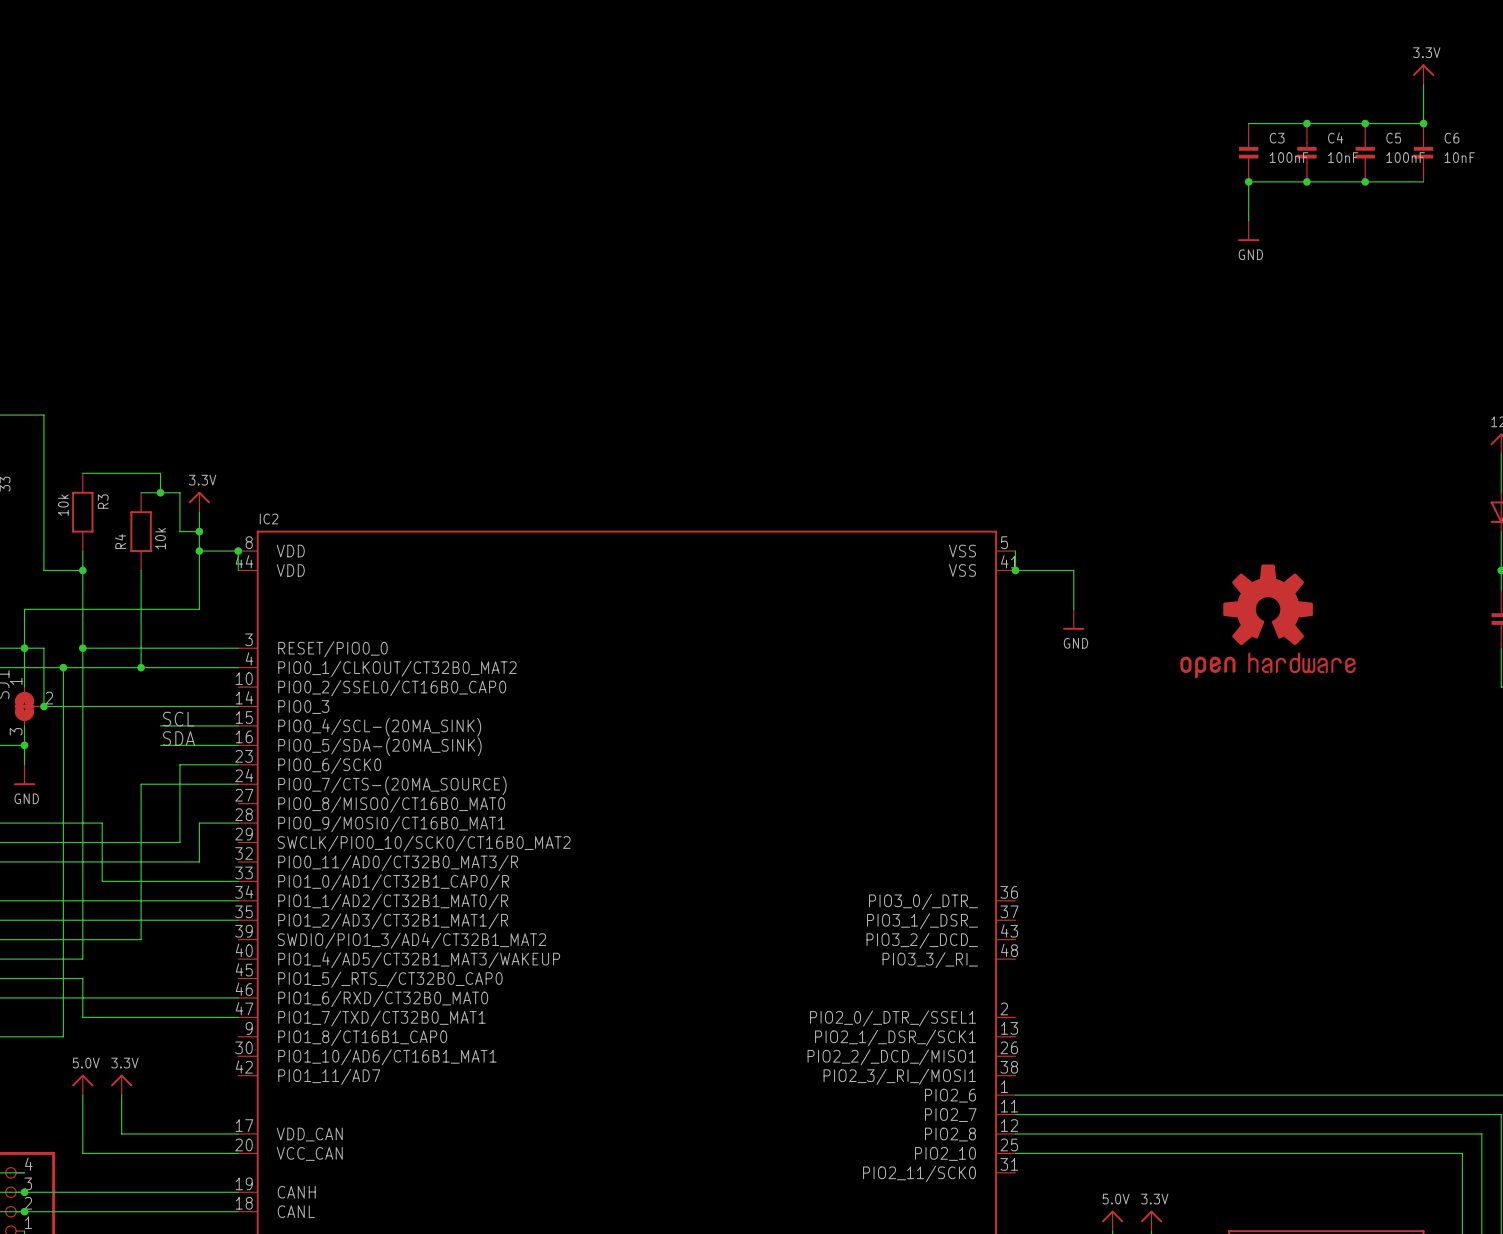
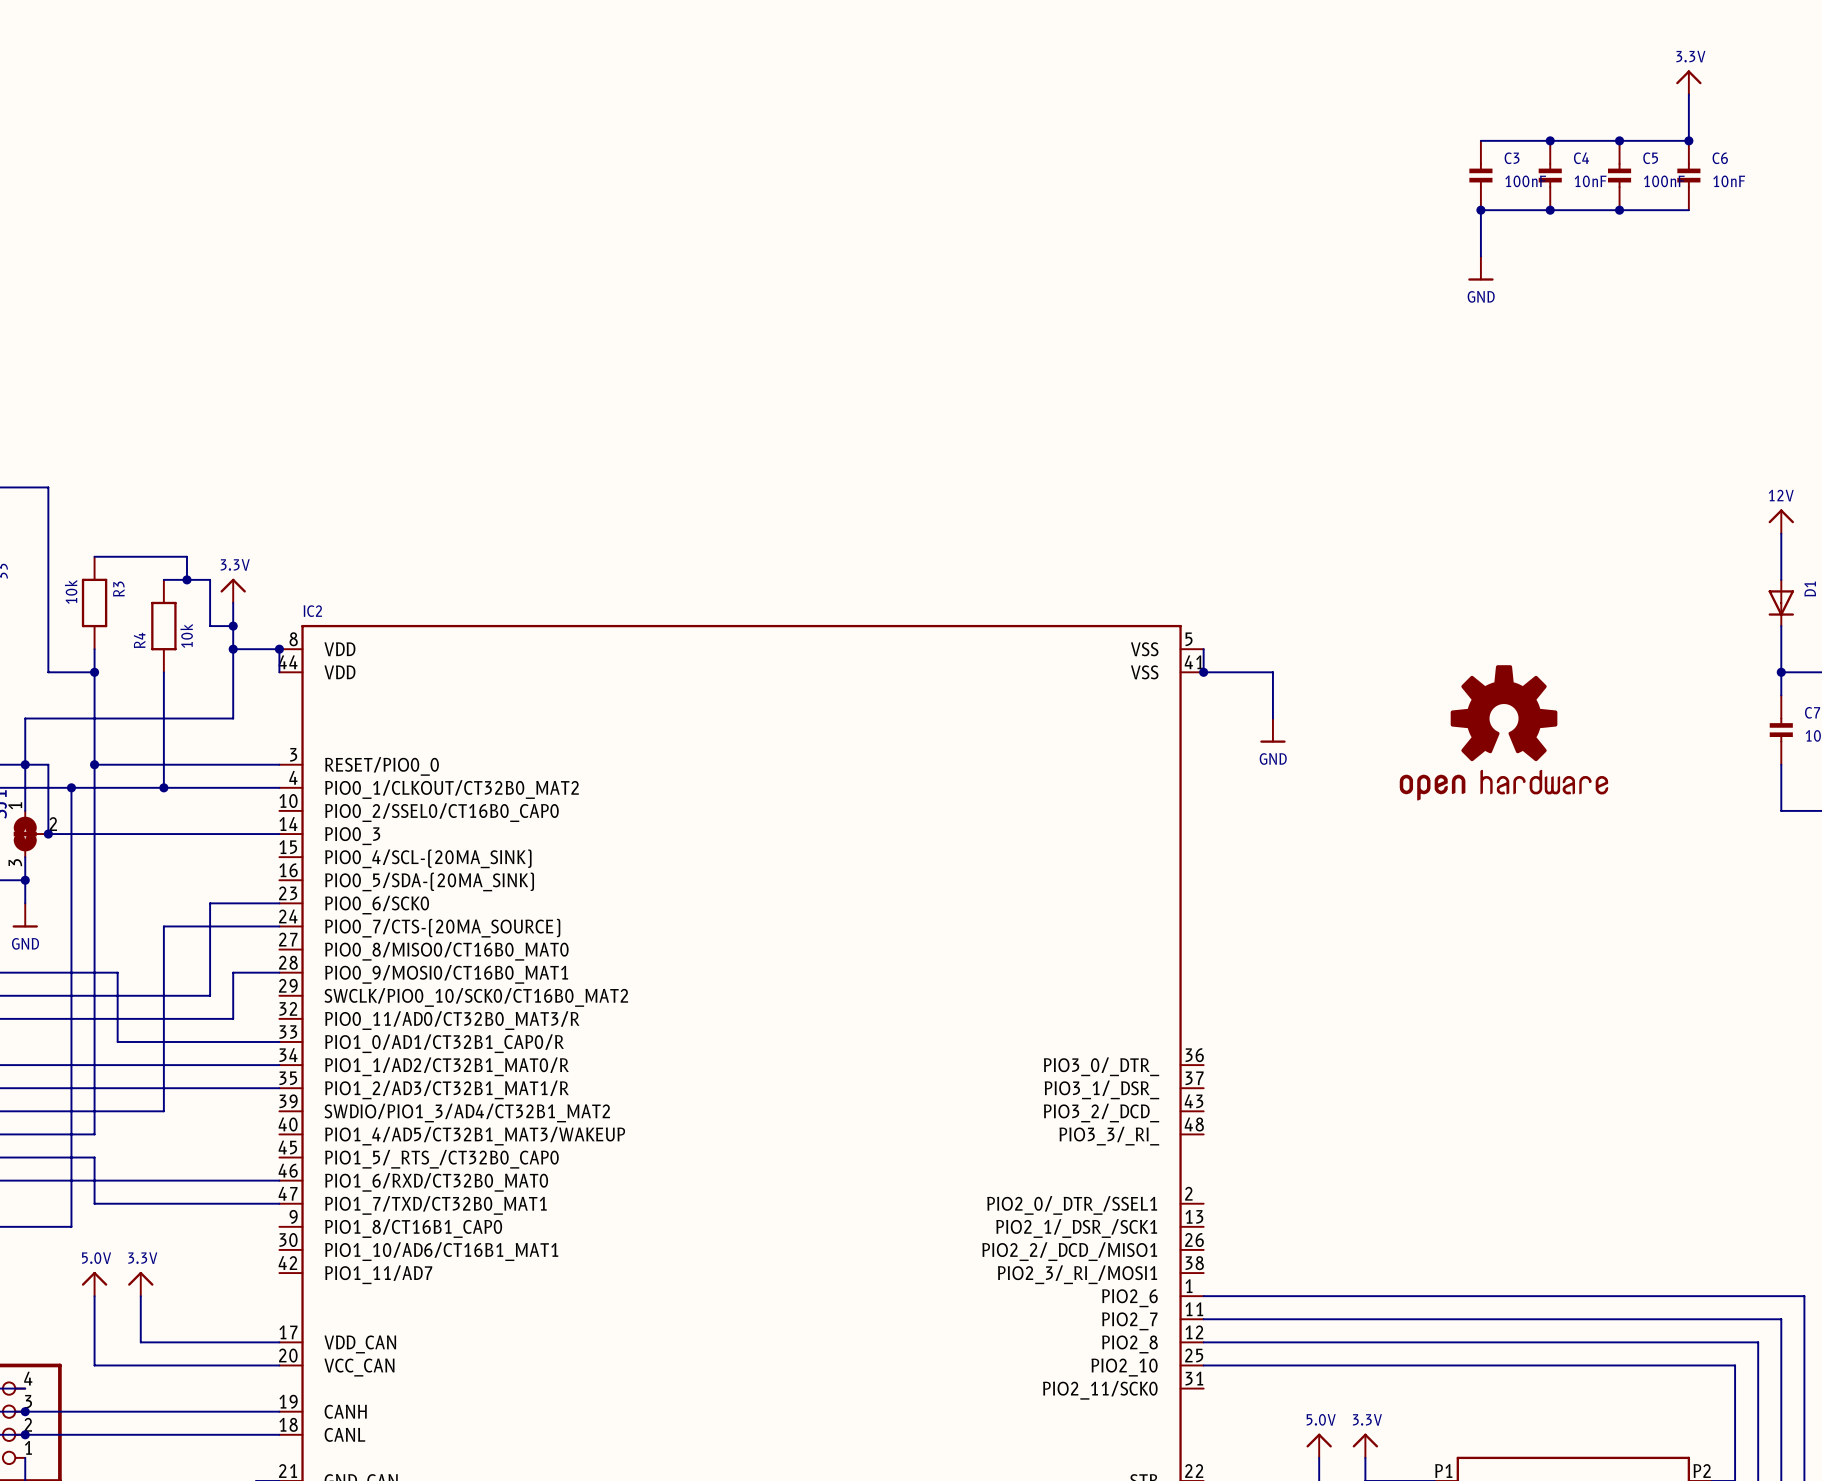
label: SCL (178, 719) -> none
wire: (160, 725) (238, 725) -> none
label: SDA (179, 738) -> none
wire: (160, 745) (238, 745) -> none

